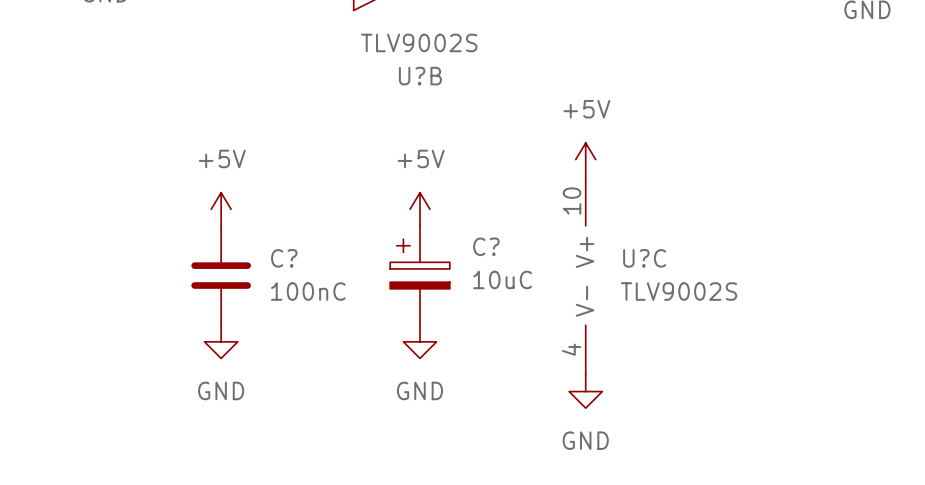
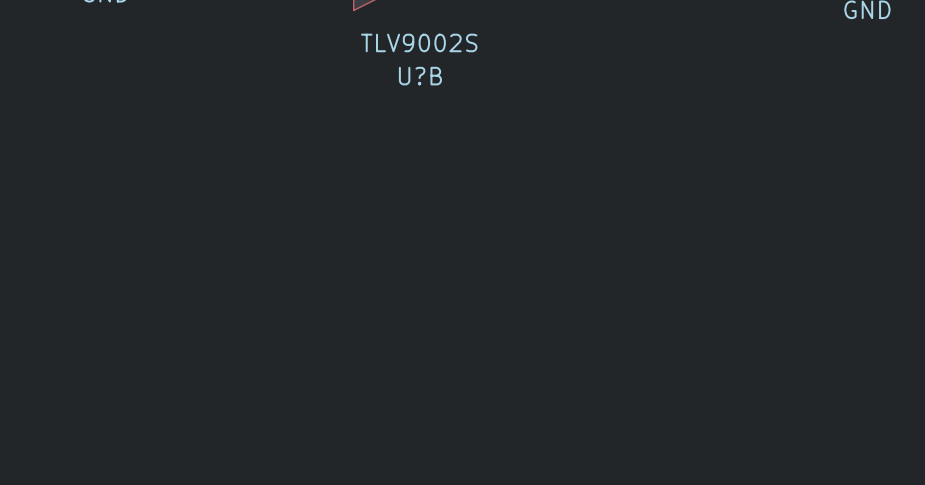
power symbol: +5V (585, 159) -> none
power symbol: +5V (221, 209) -> none
power symbol: +5V (420, 209) -> none
C?: 100nC (221, 275) -> none
C?: 10uC (420, 275) -> none
U?C: TLV9002S (585, 275) -> none
power symbol: GND (221, 341) -> none
power symbol: GND (420, 341) -> none
power symbol: GND (585, 391) -> none

